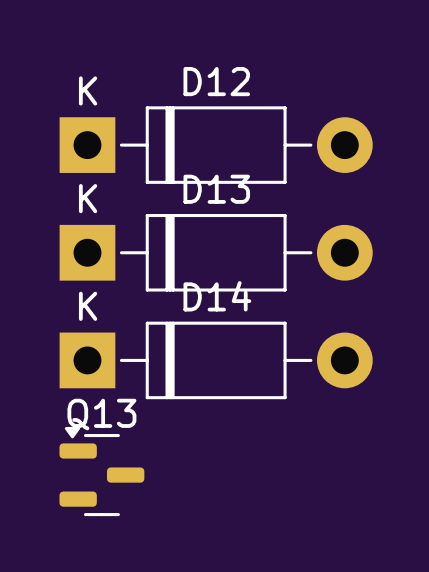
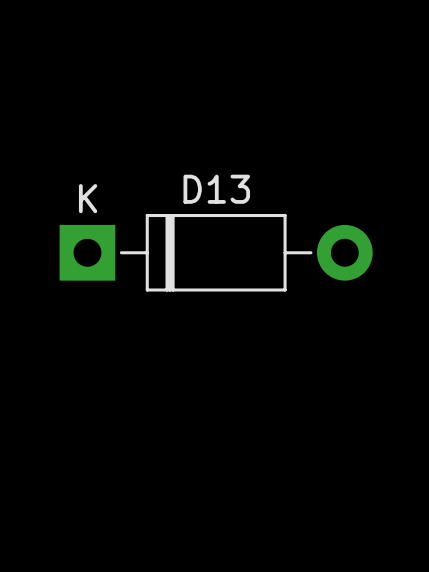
D12: (216, 145) -> none
D14: (216, 360) -> none
Q13: (101, 471) -> none

